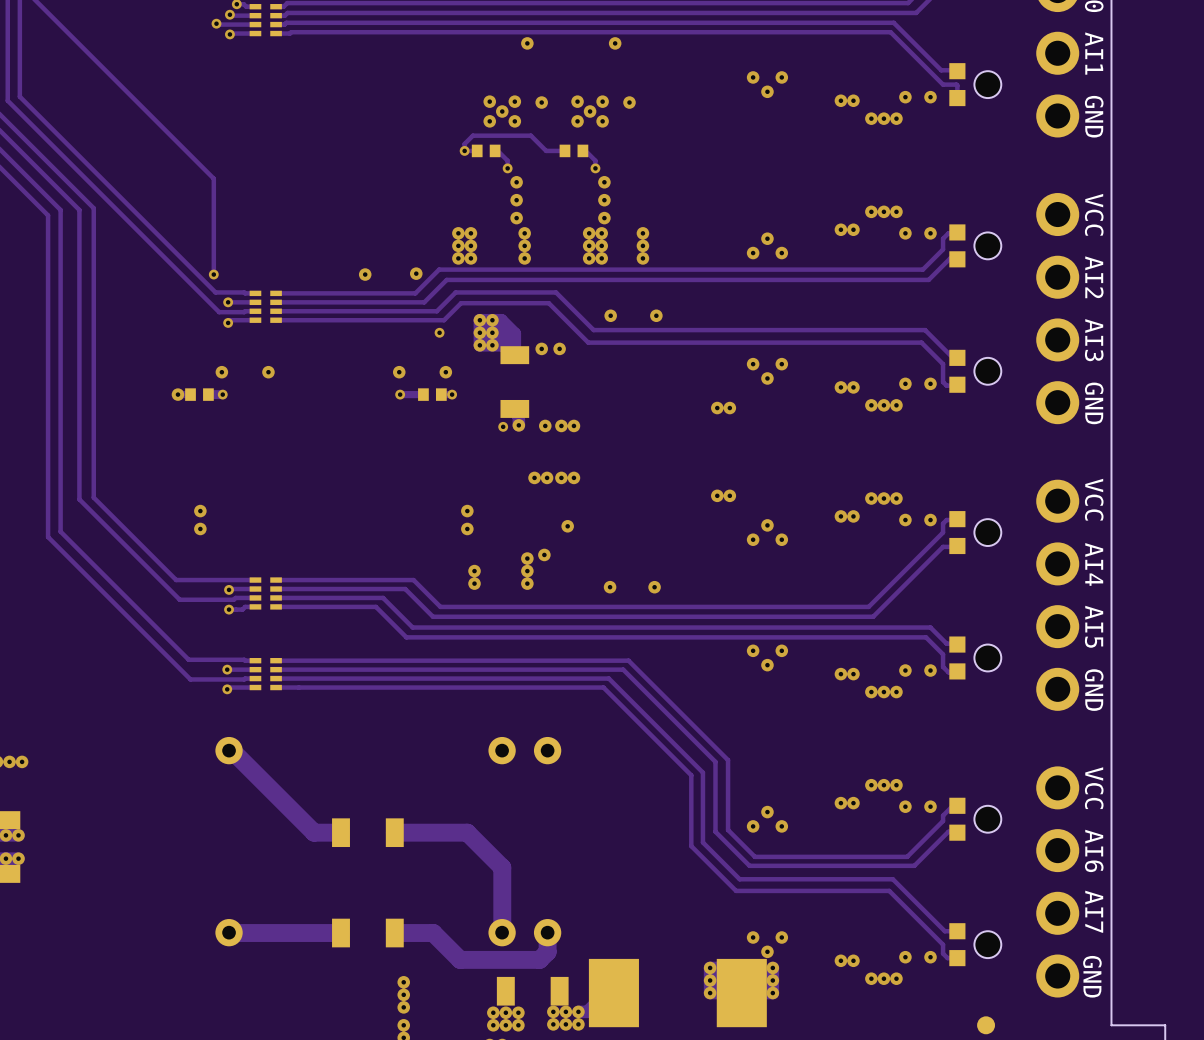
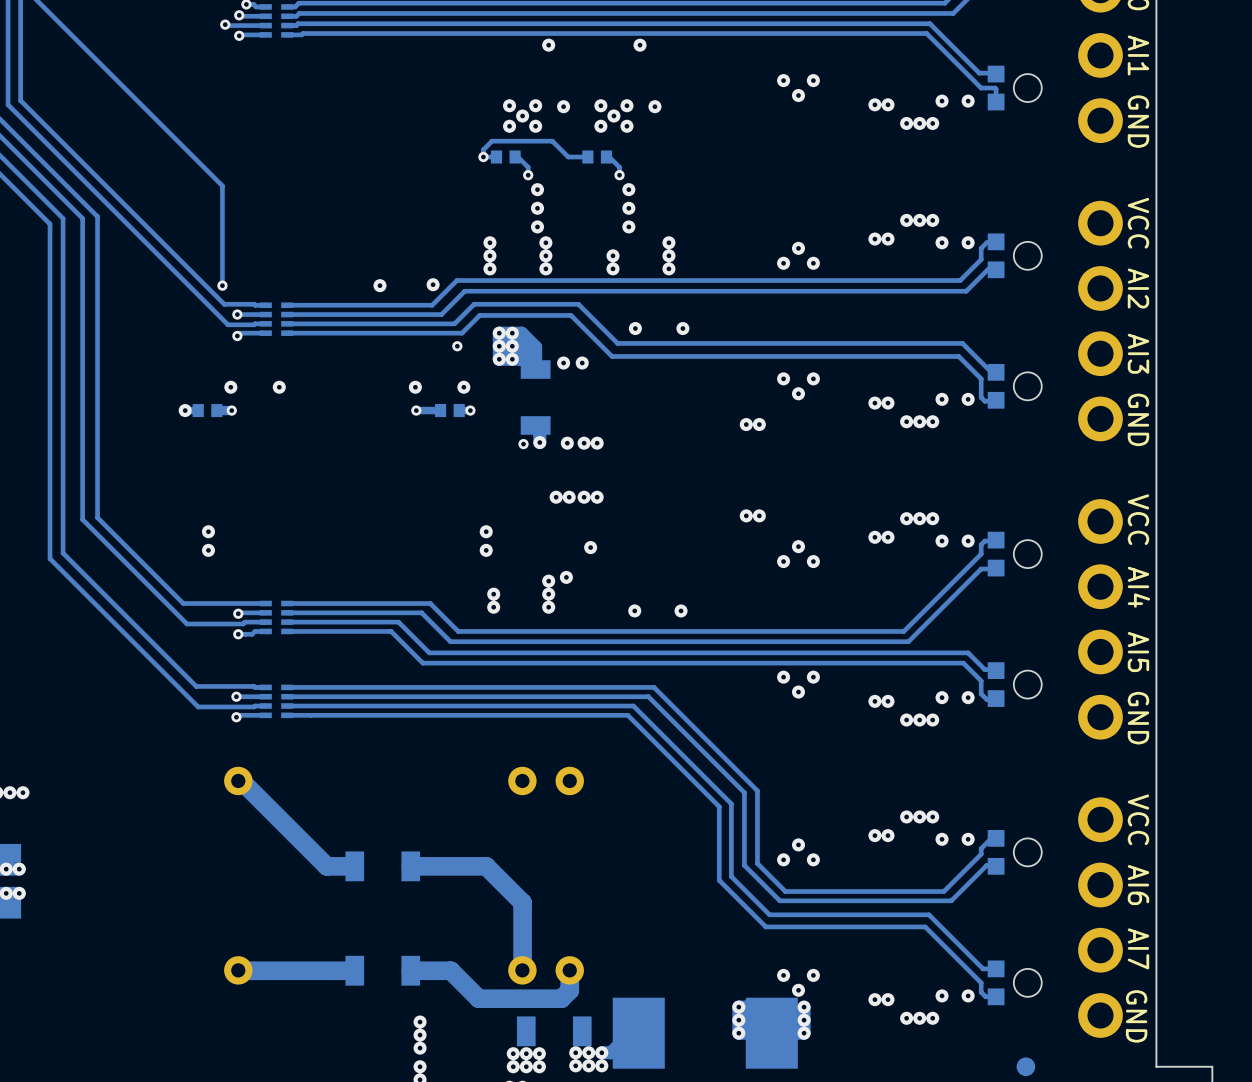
via: (458, 233) -> none
via: (589, 233) -> none
via: (601, 233) -> none
via: (458, 245) -> none
via: (601, 245) -> none
via: (458, 258) -> none
via: (601, 258) -> none

